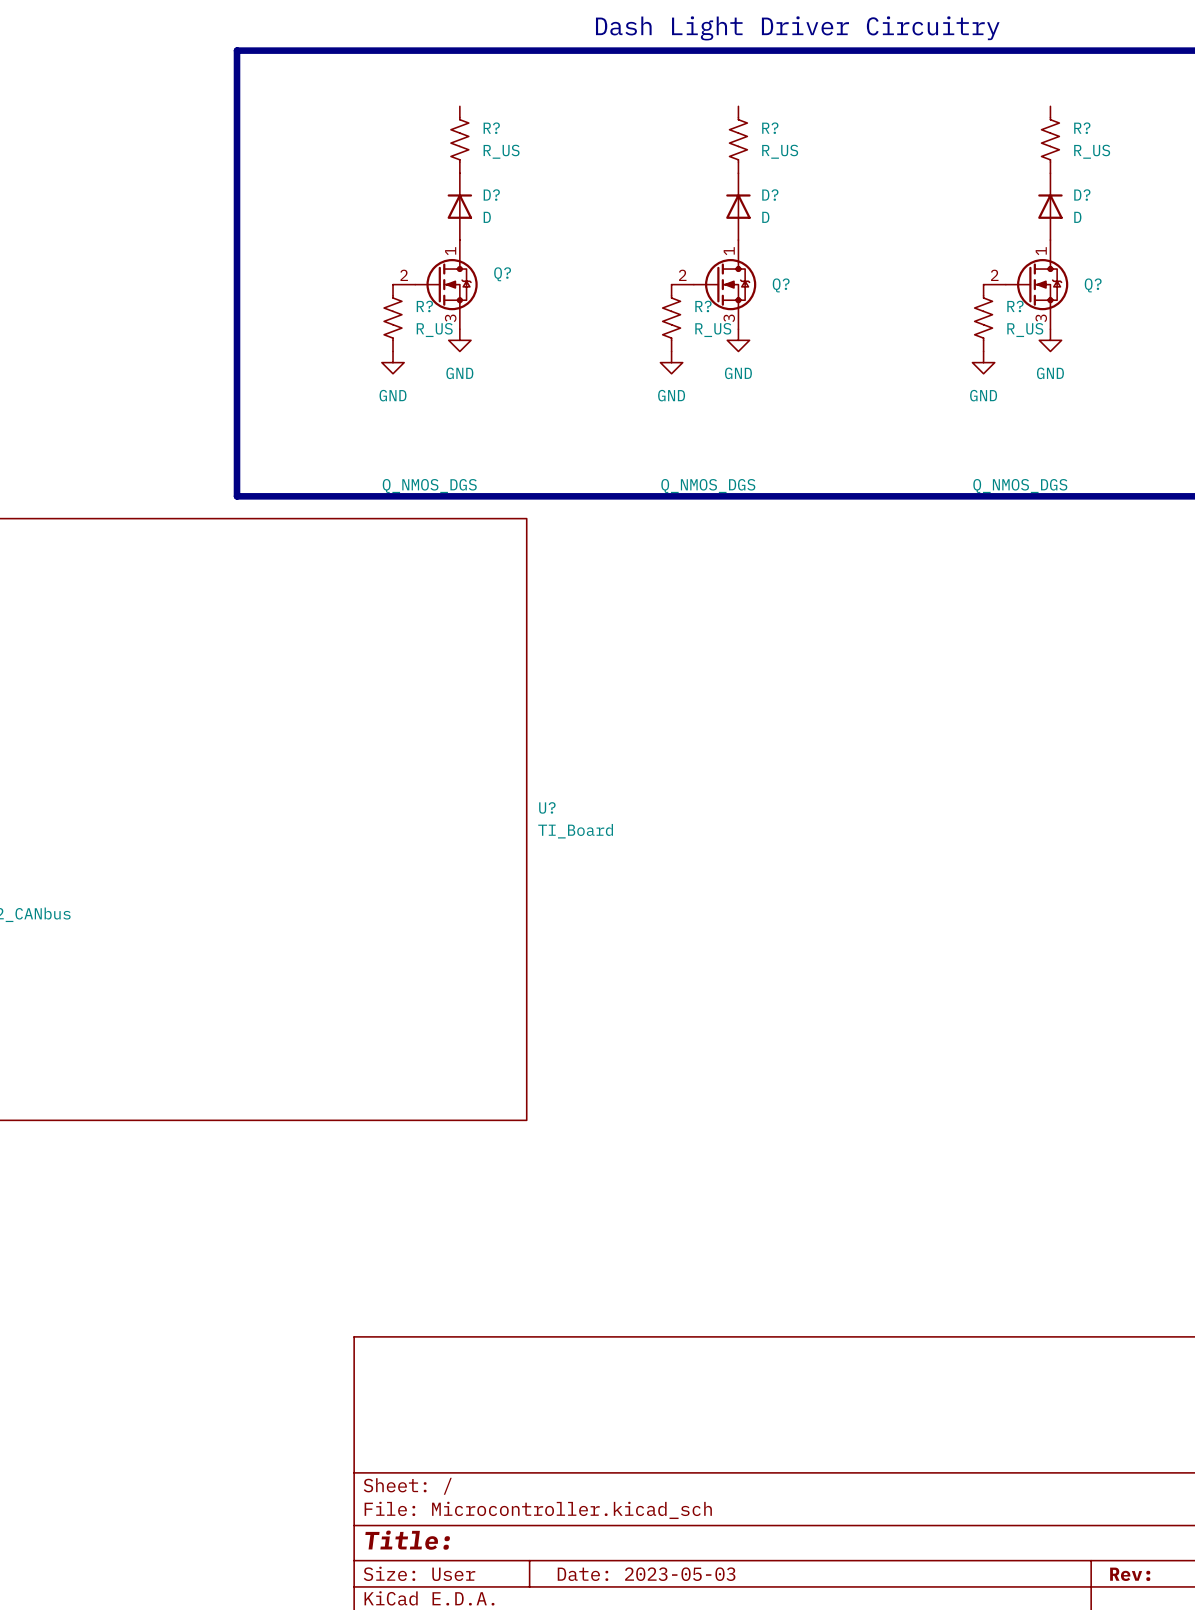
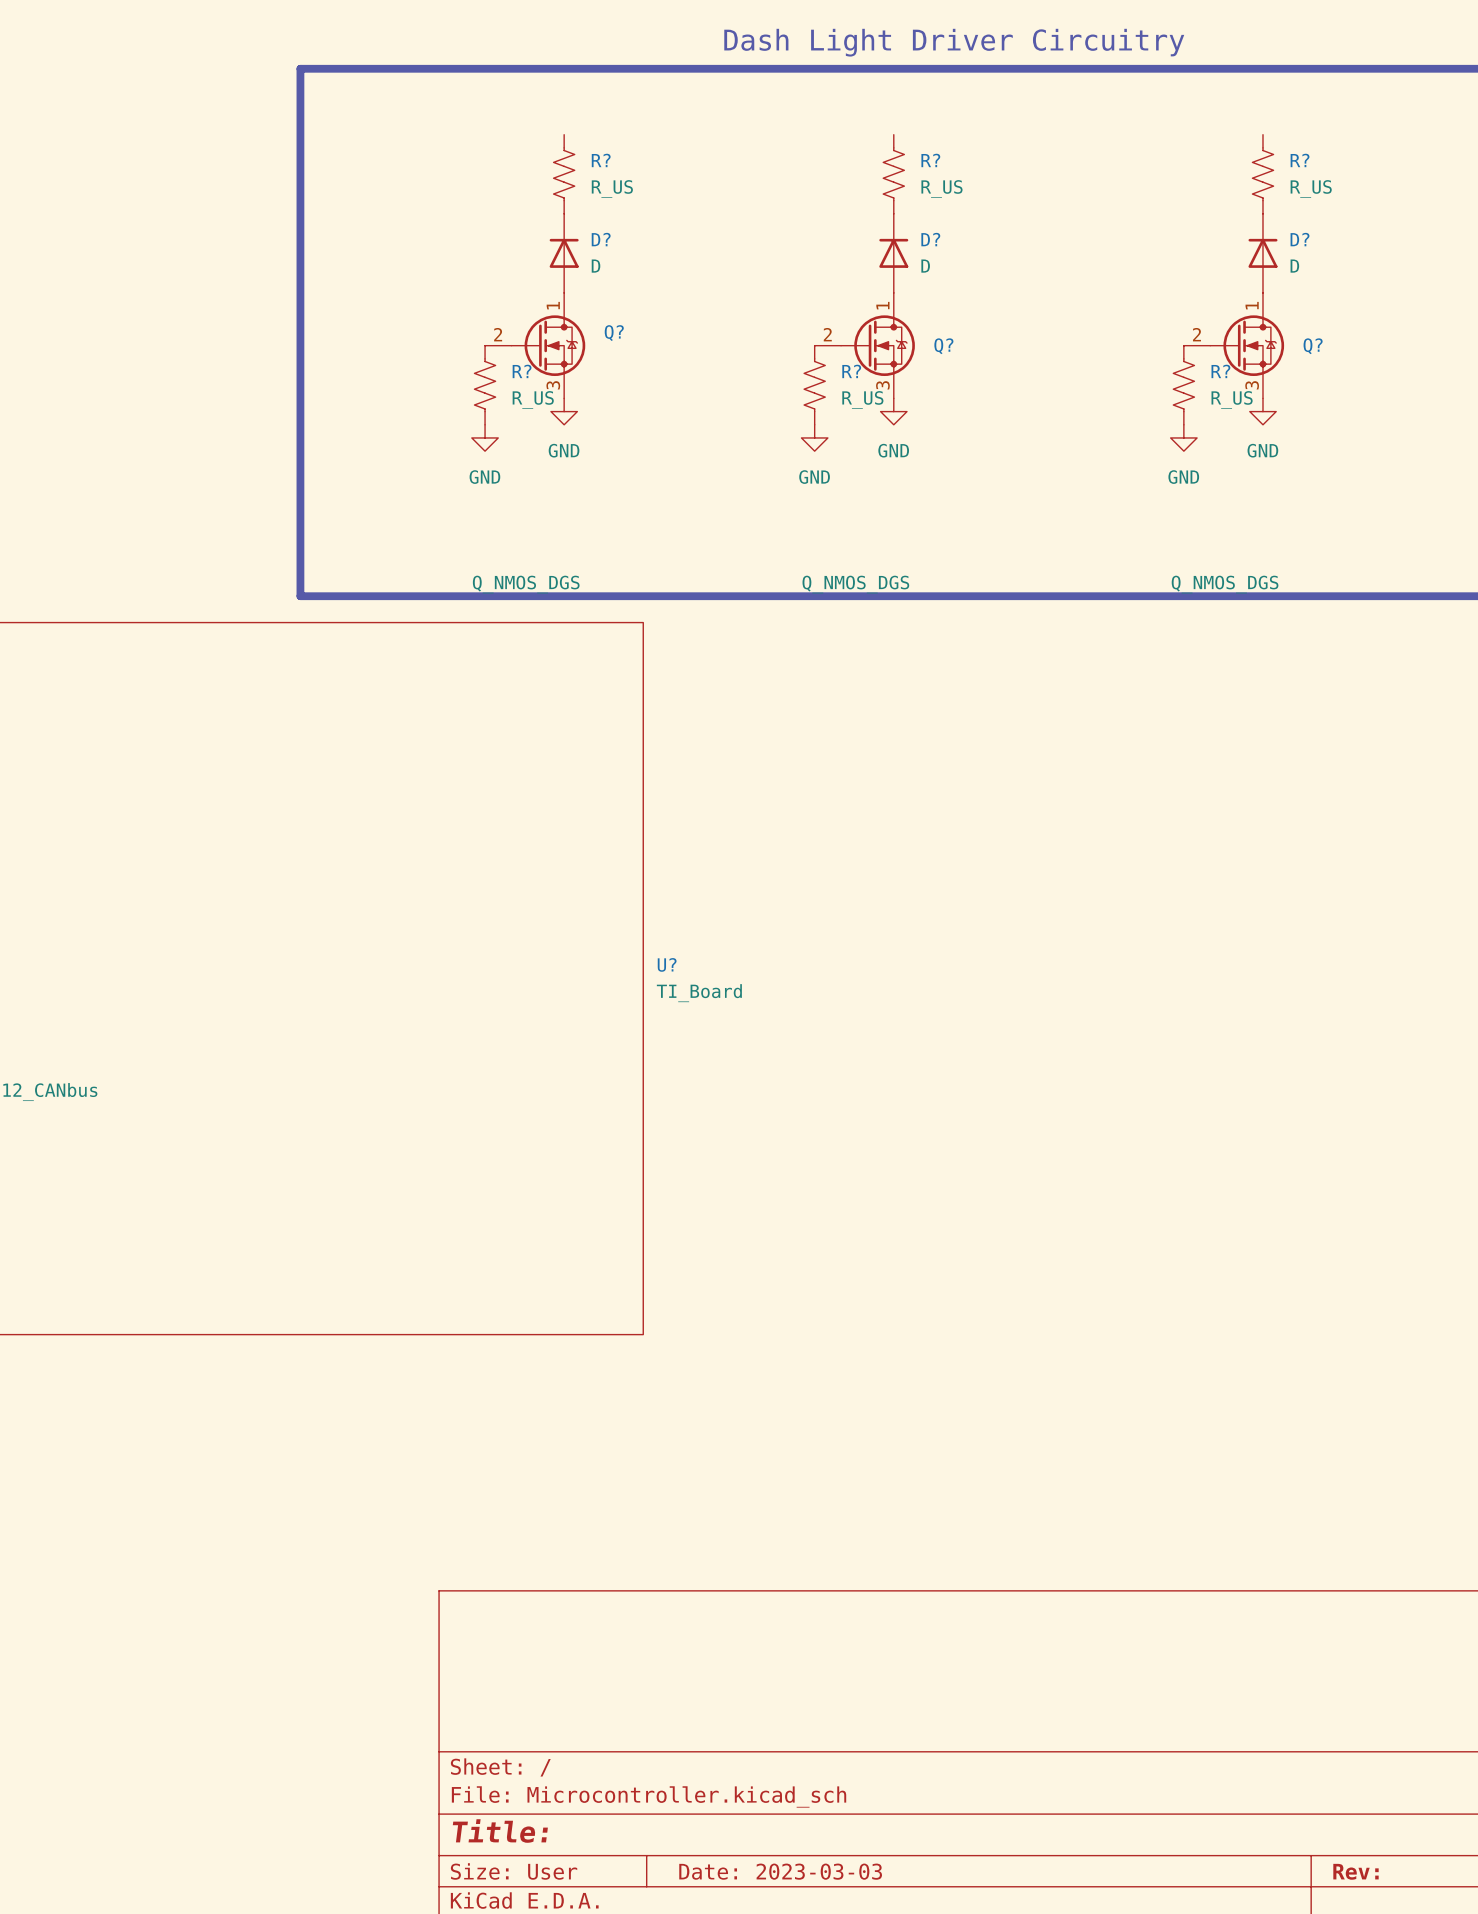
title block: Date: 2023-05-03 (646, 1574) -> Date: 2023-03-03 (780, 1871)

